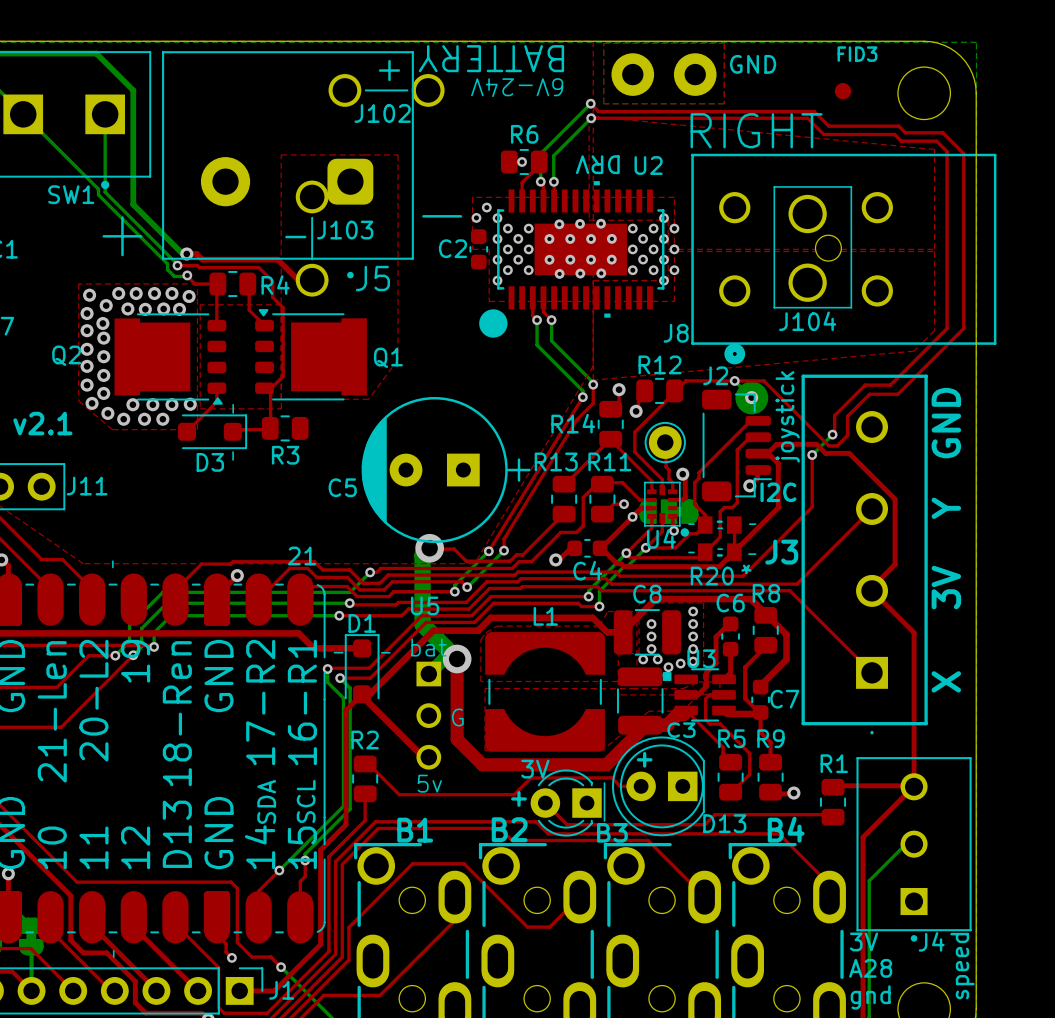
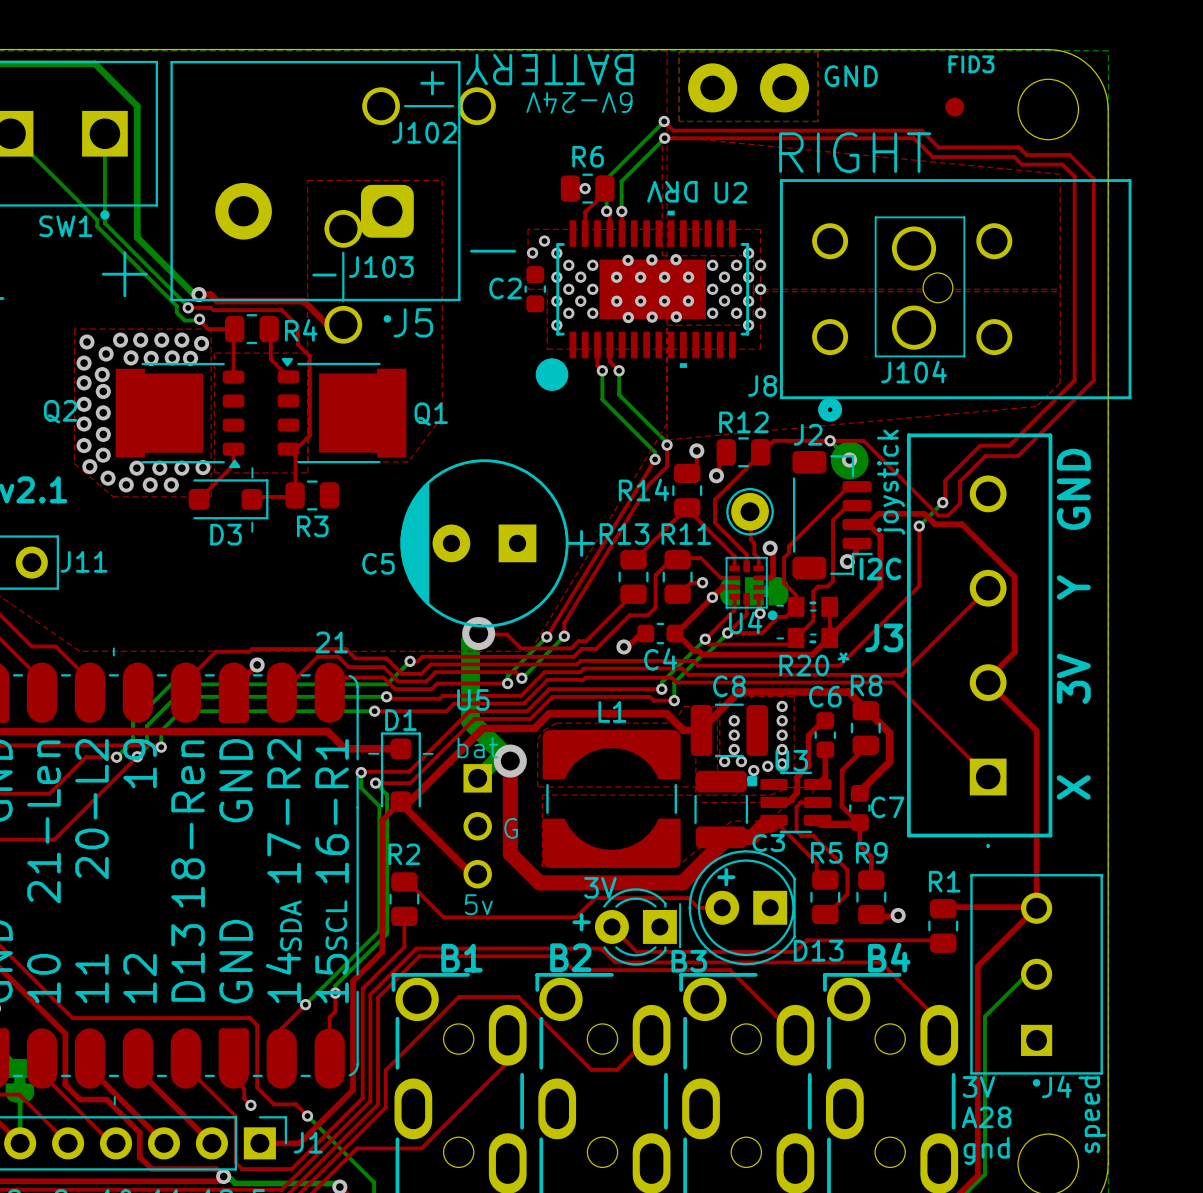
line: (749, 524) (755, 524) -> none
line: (748, 554) (755, 554) -> none

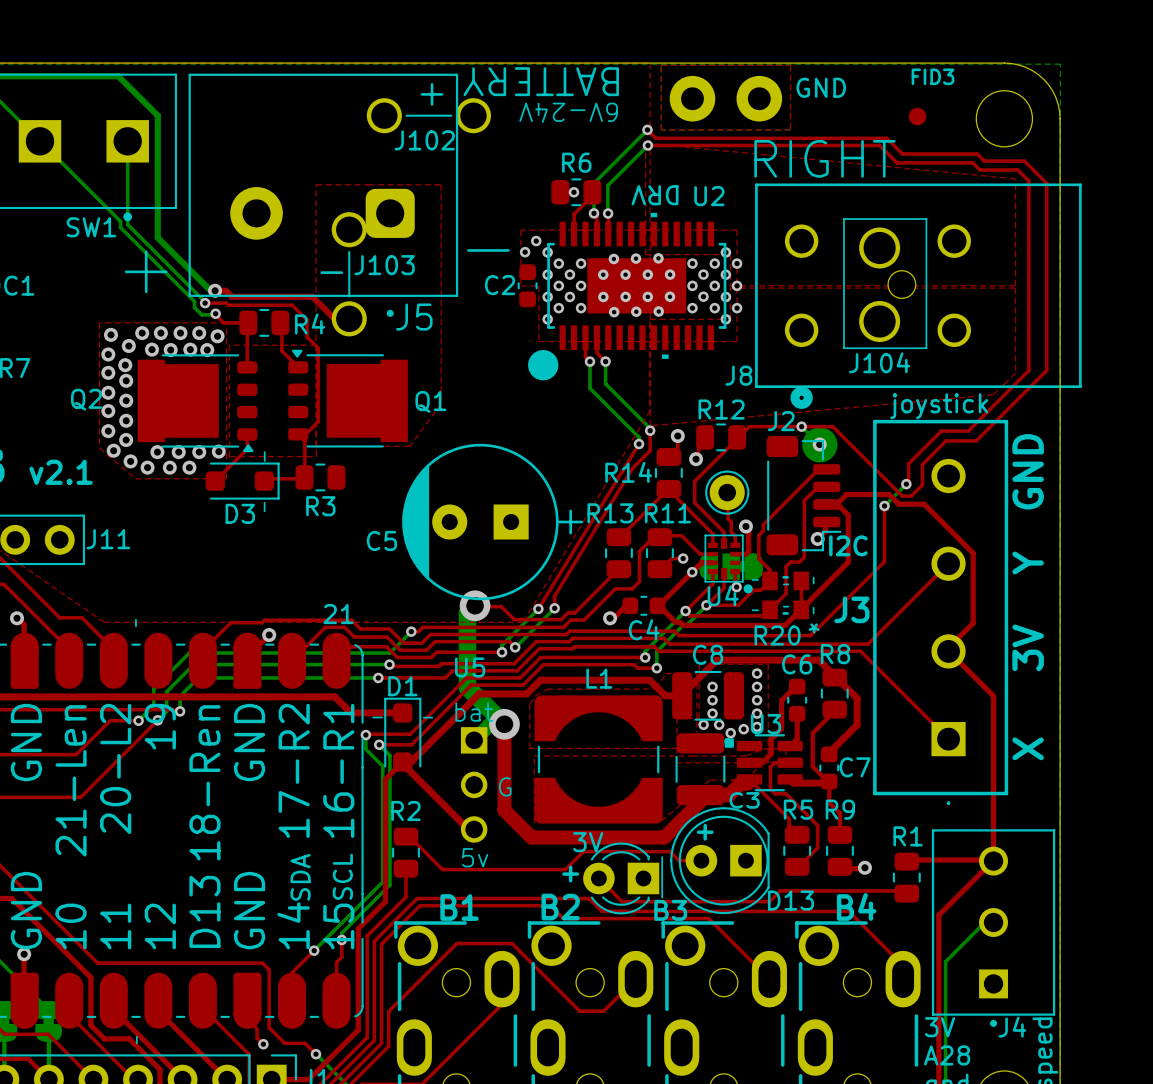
text rotation: 0° (891, 482) -> 90° clockwise (939, 406)
line: none -> (813, 577) (813, 583)
line: none -> (813, 607) (813, 613)

